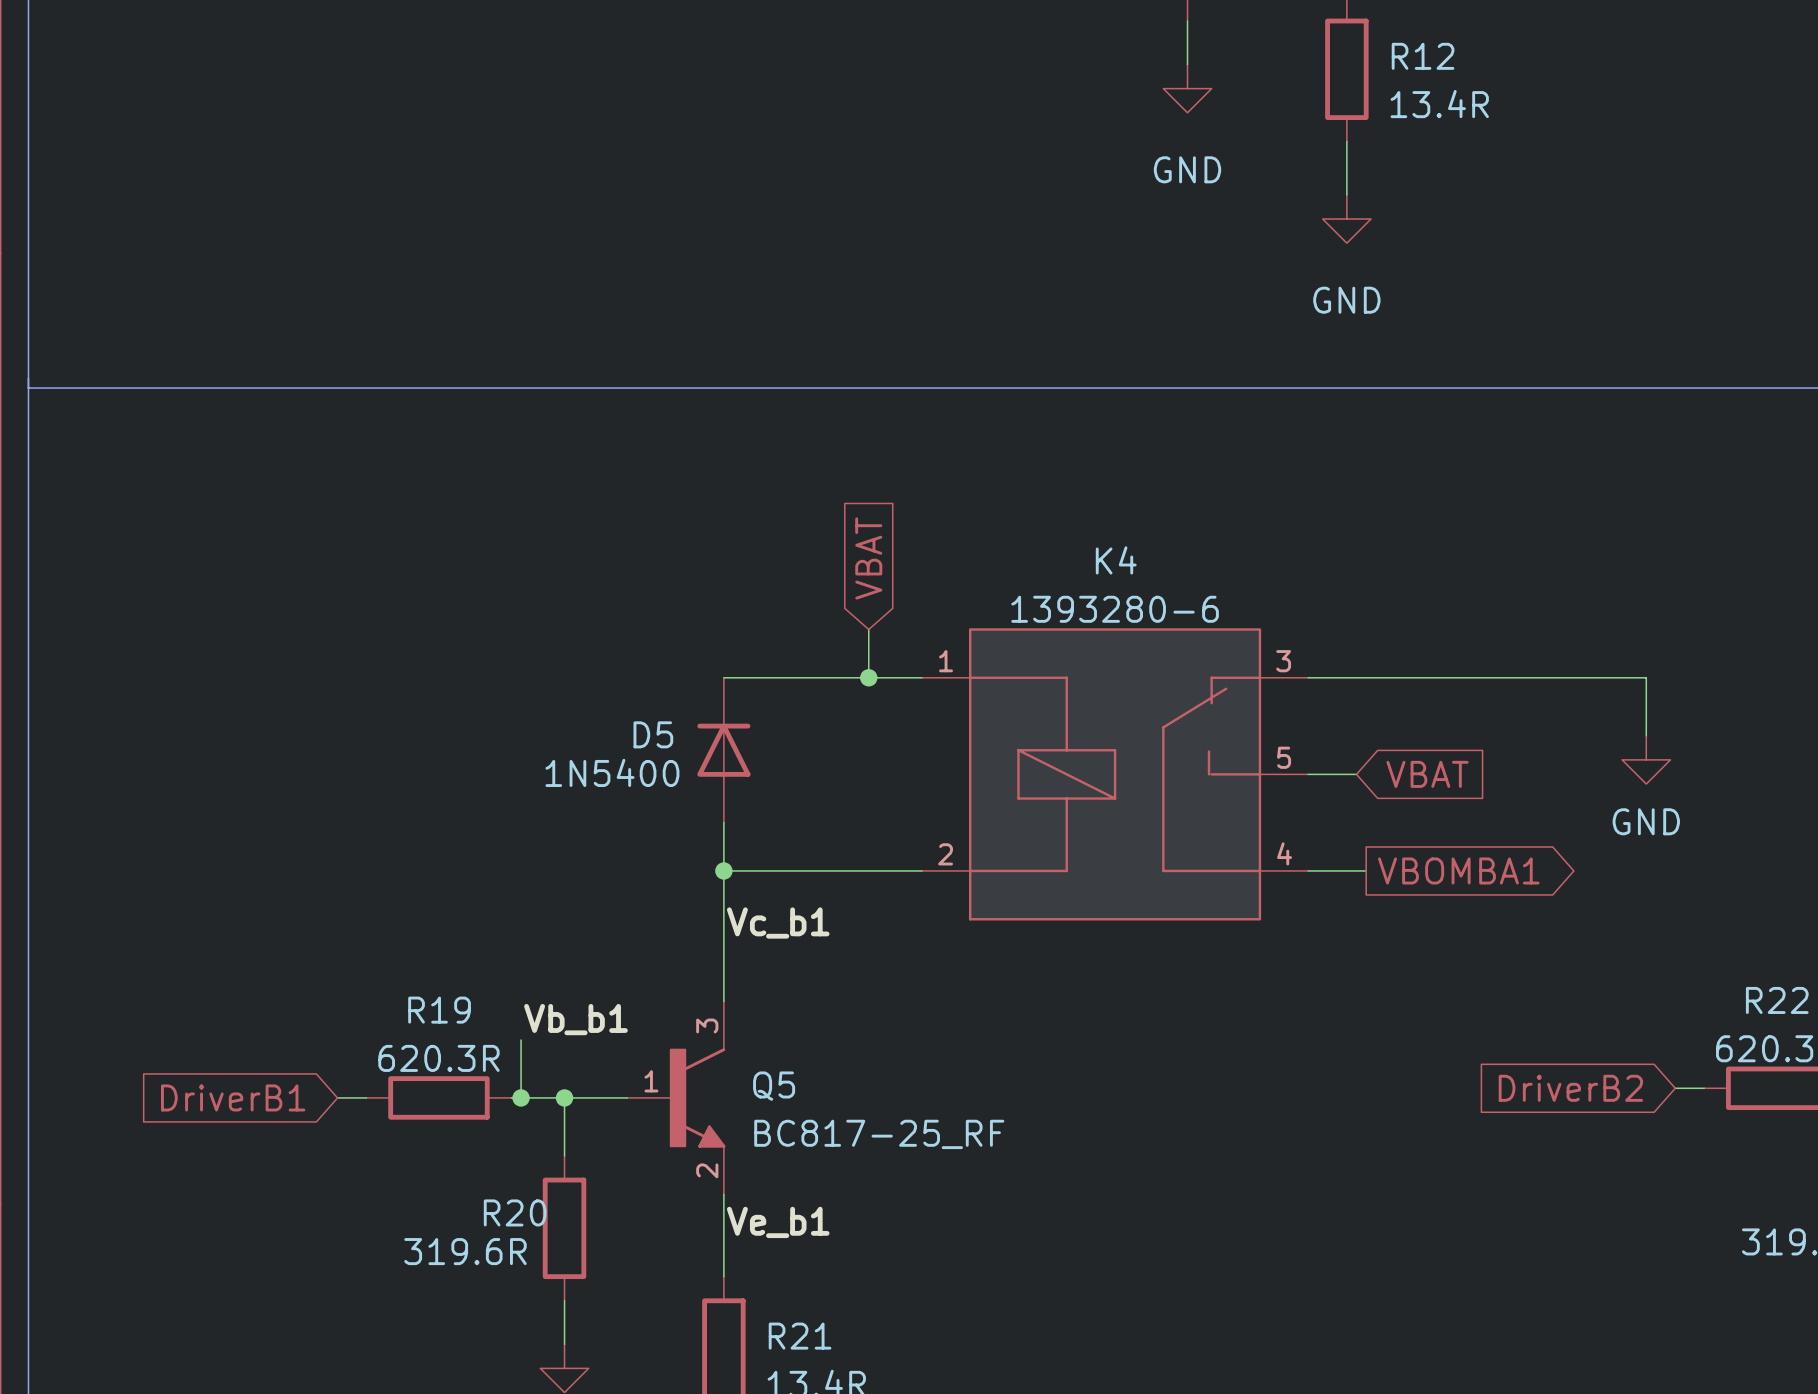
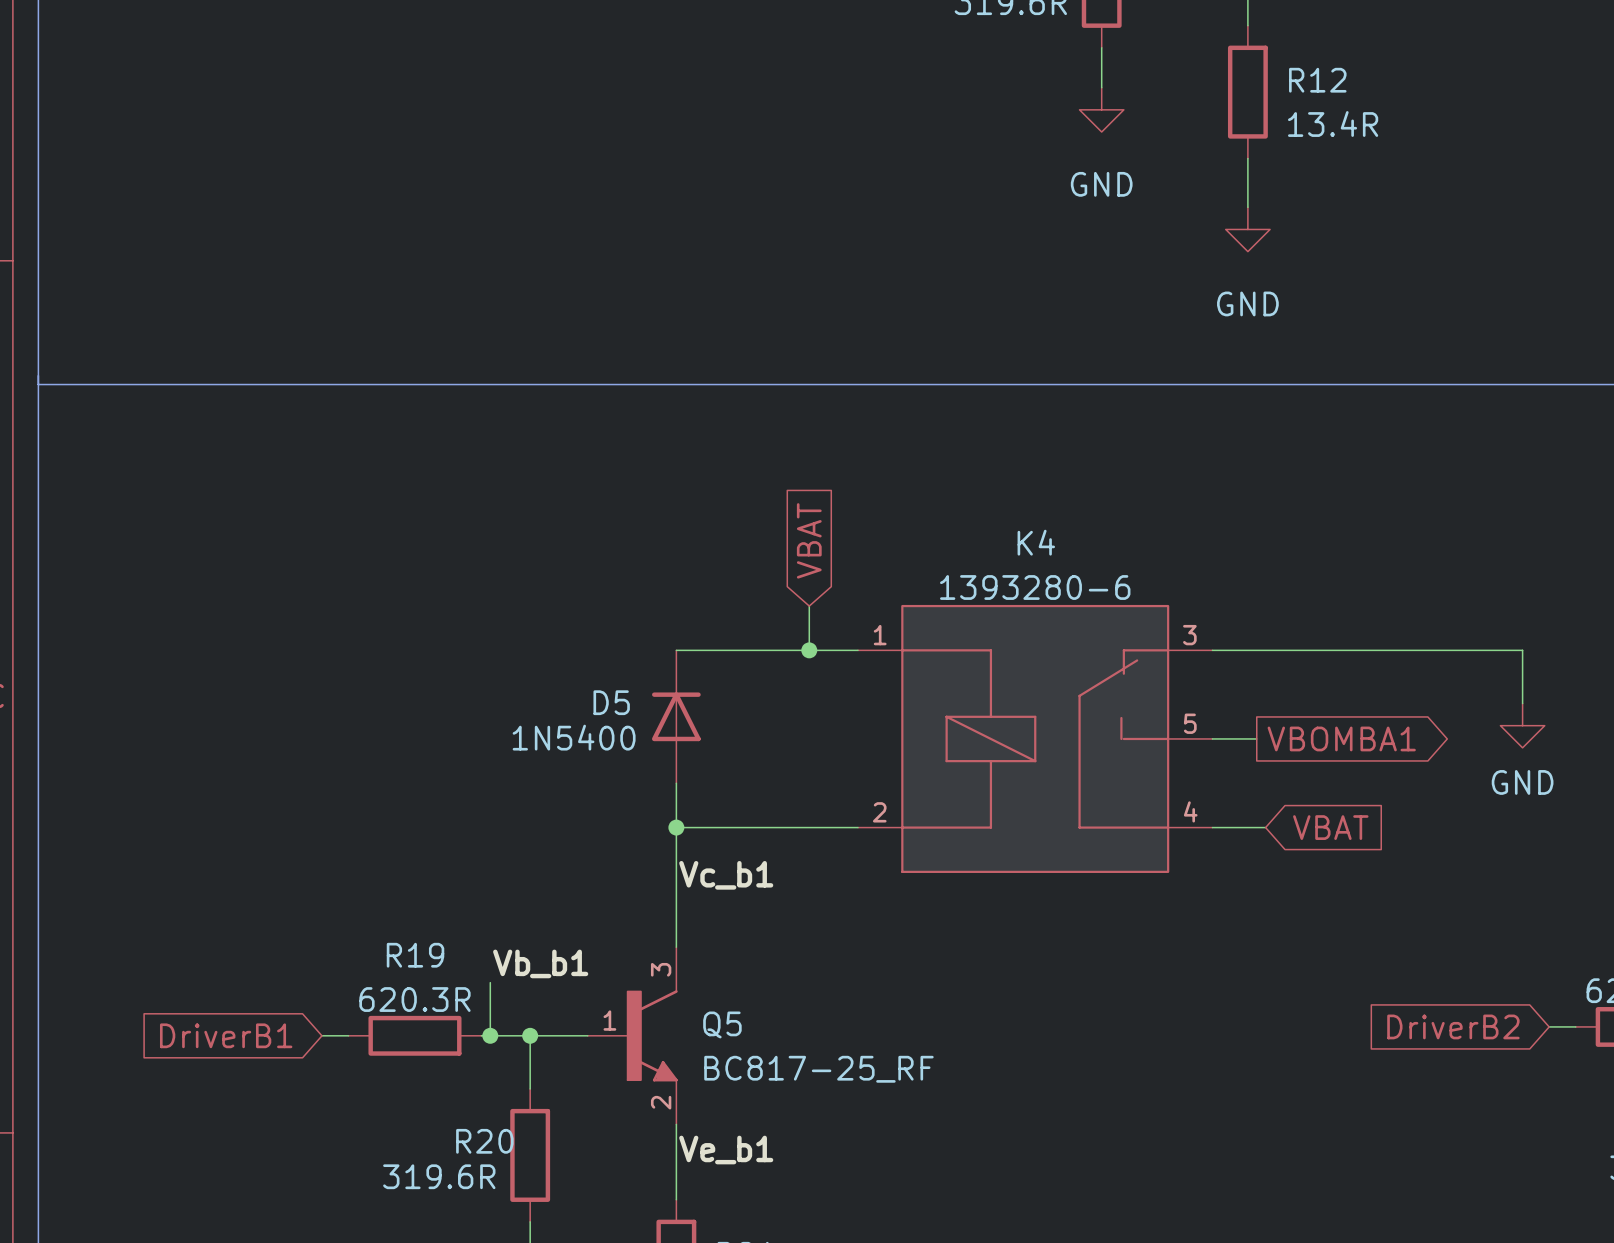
global label shape: input (1427, 774) -> output (1341, 738)
global label: VBAT (1427, 774) -> VBOMBA1 (1341, 738)
global label shape: output (1458, 870) -> input (1330, 827)
global label: VBOMBA1 (1458, 870) -> VBAT (1330, 827)

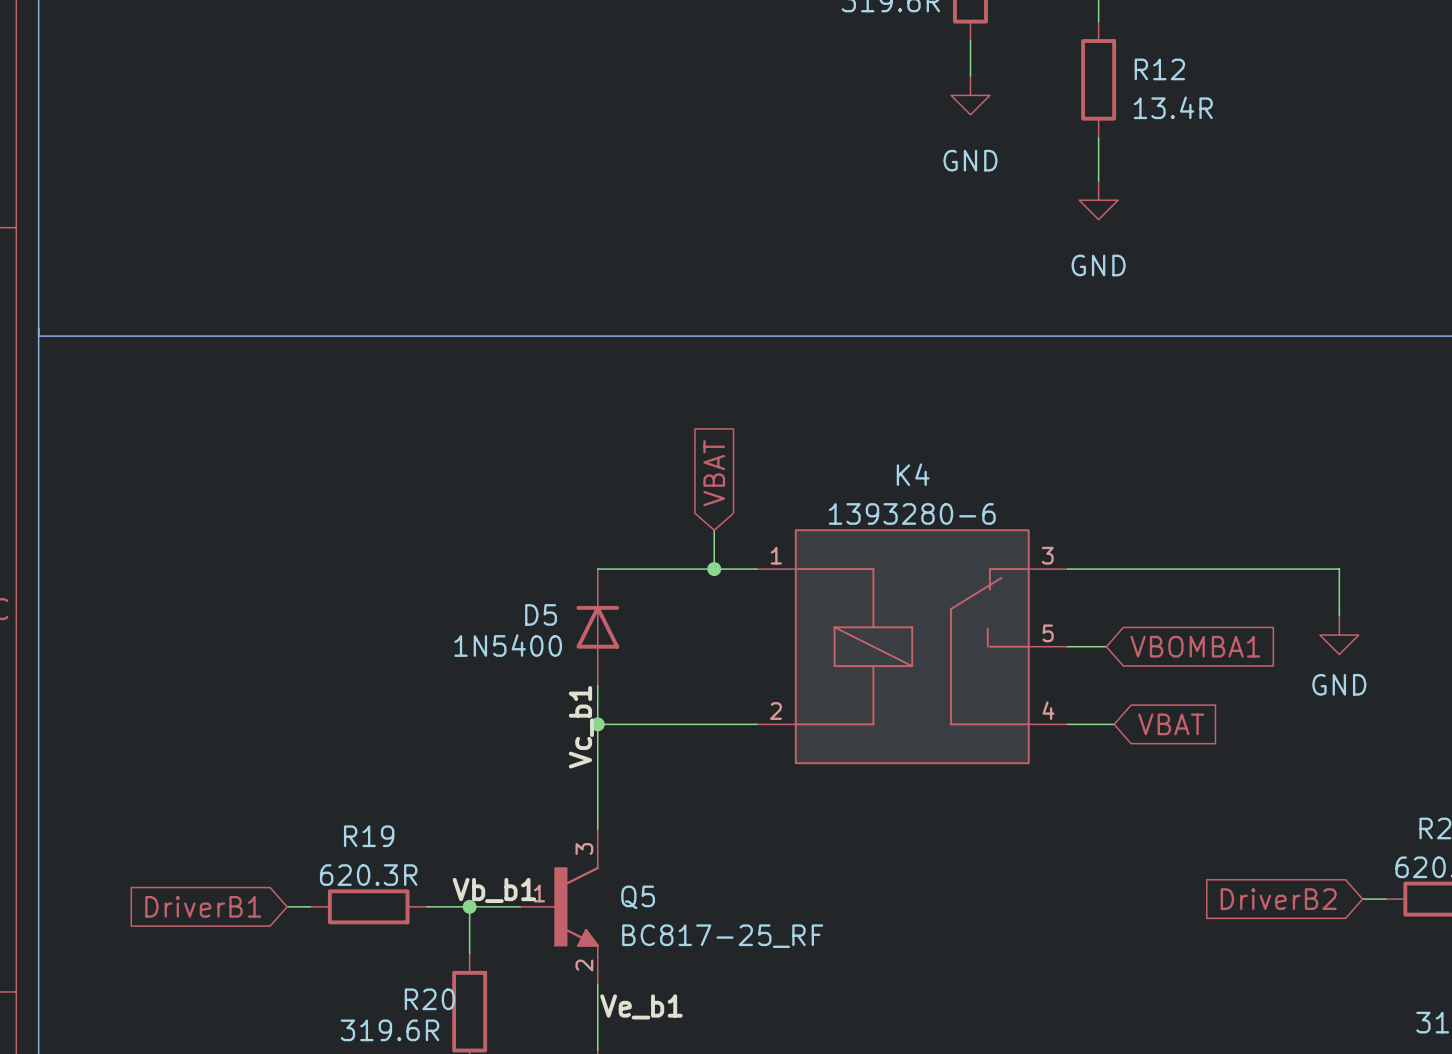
global label shape: output (1341, 738) -> input (1195, 646)
label rotation: 0° (726, 875) -> 90° counterclockwise (581, 727)
label position: Vb_b1 (540, 963) -> Vb_b1 (494, 890)
wire: (490, 982) (490, 1035) -> none
junction: (490, 1035) -> none

